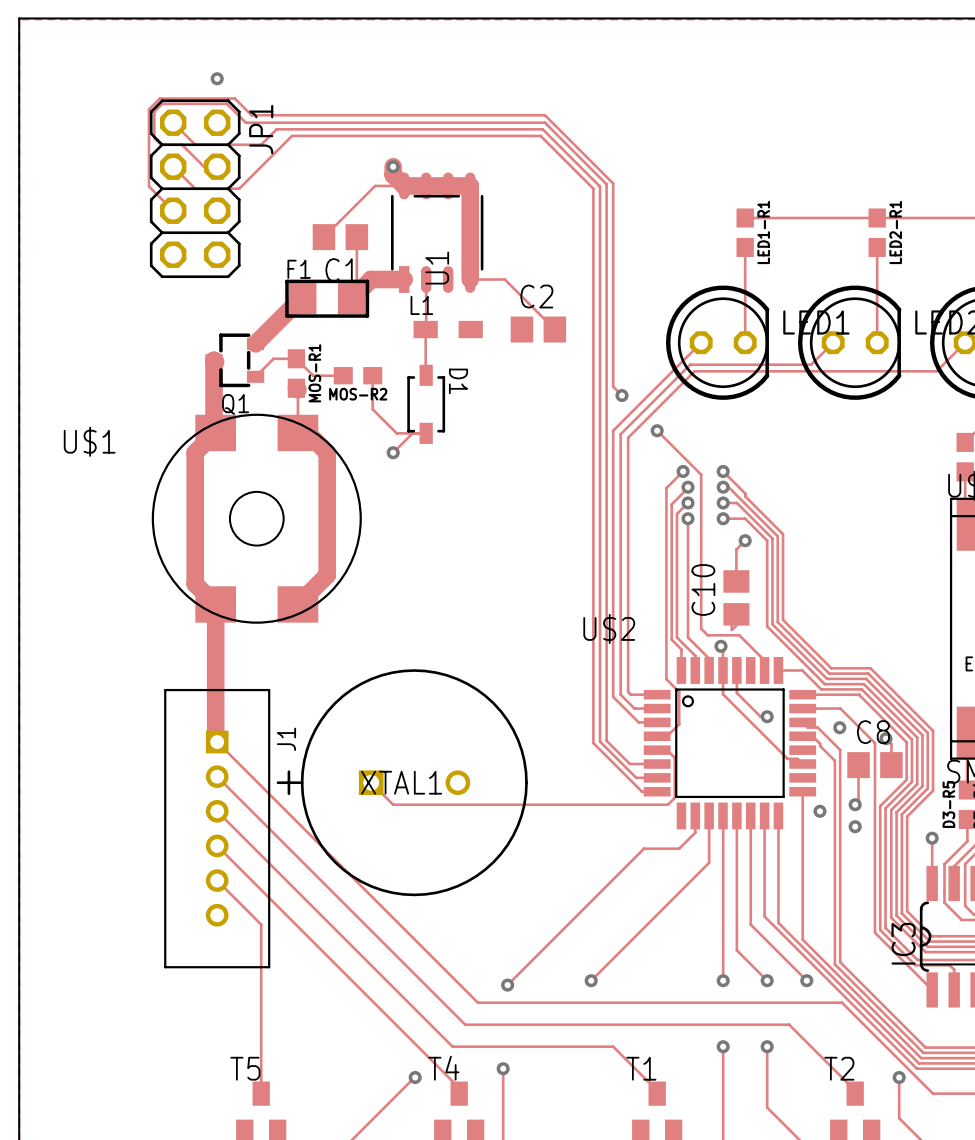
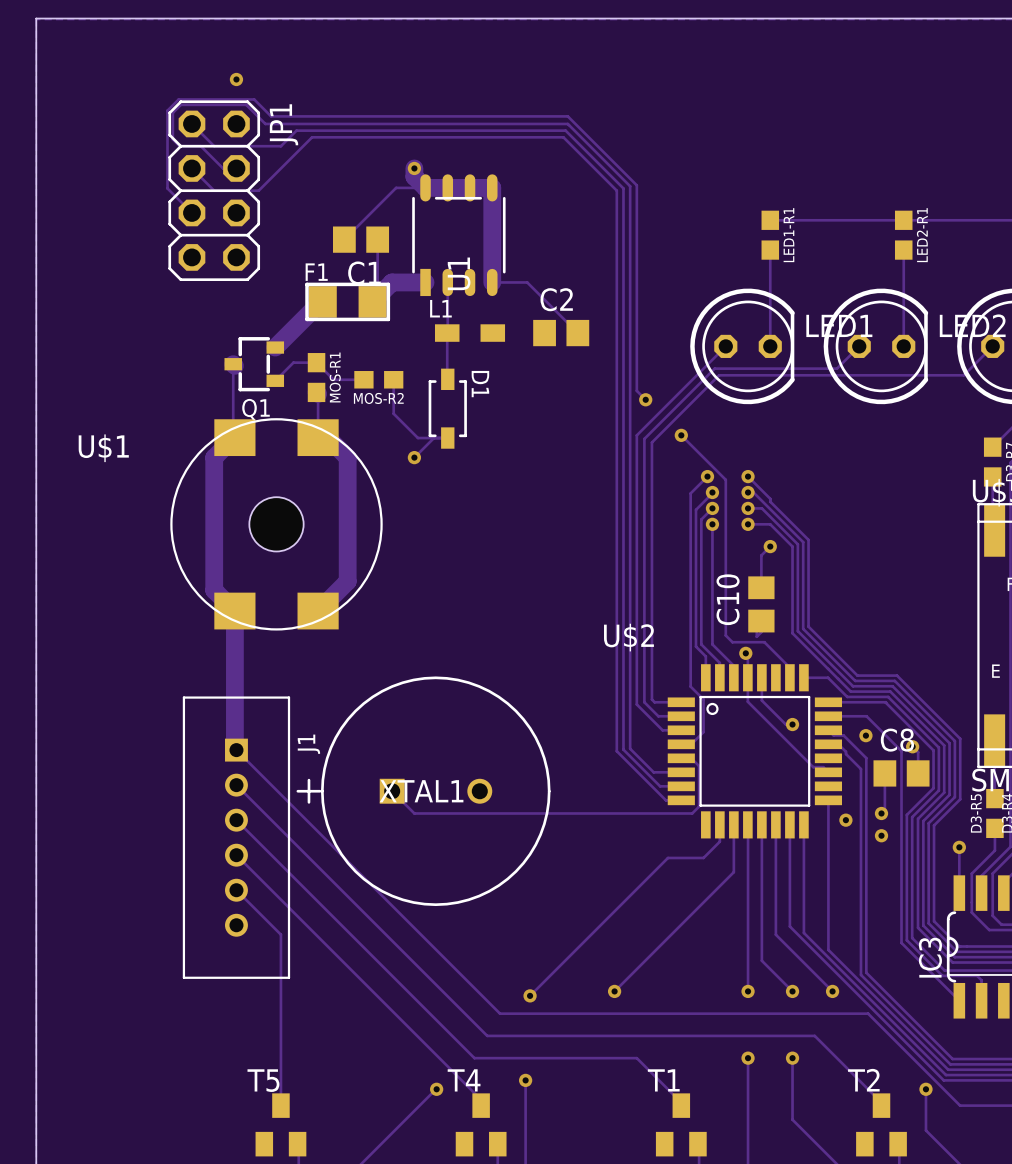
track width: thick (214, 360) (214, 431) -> thin (233, 364) (233, 435)

